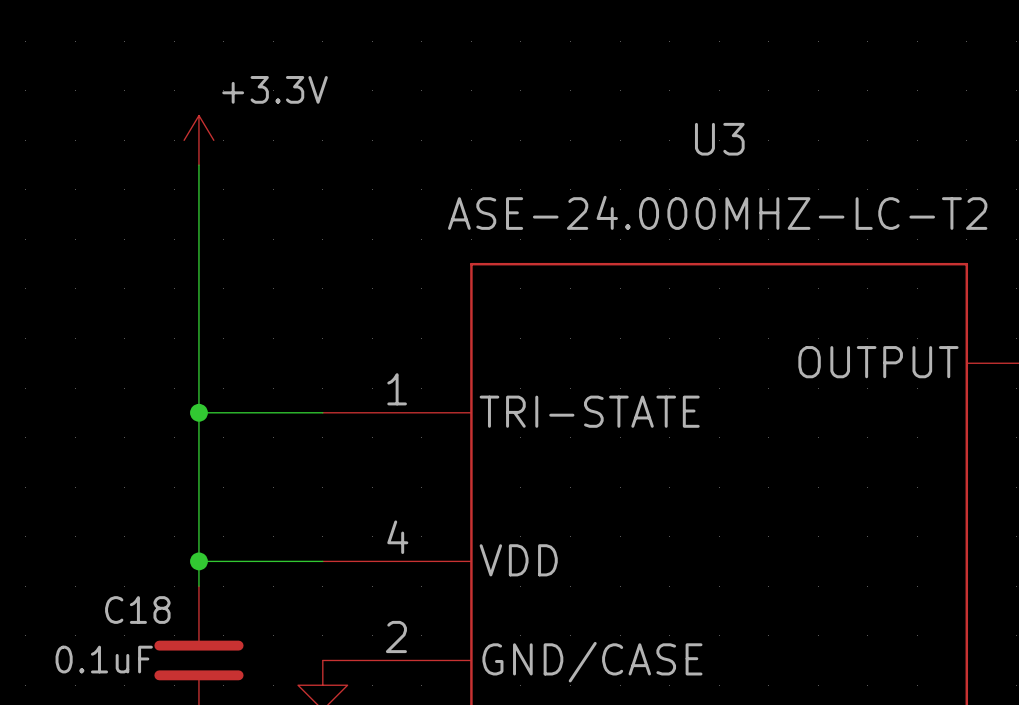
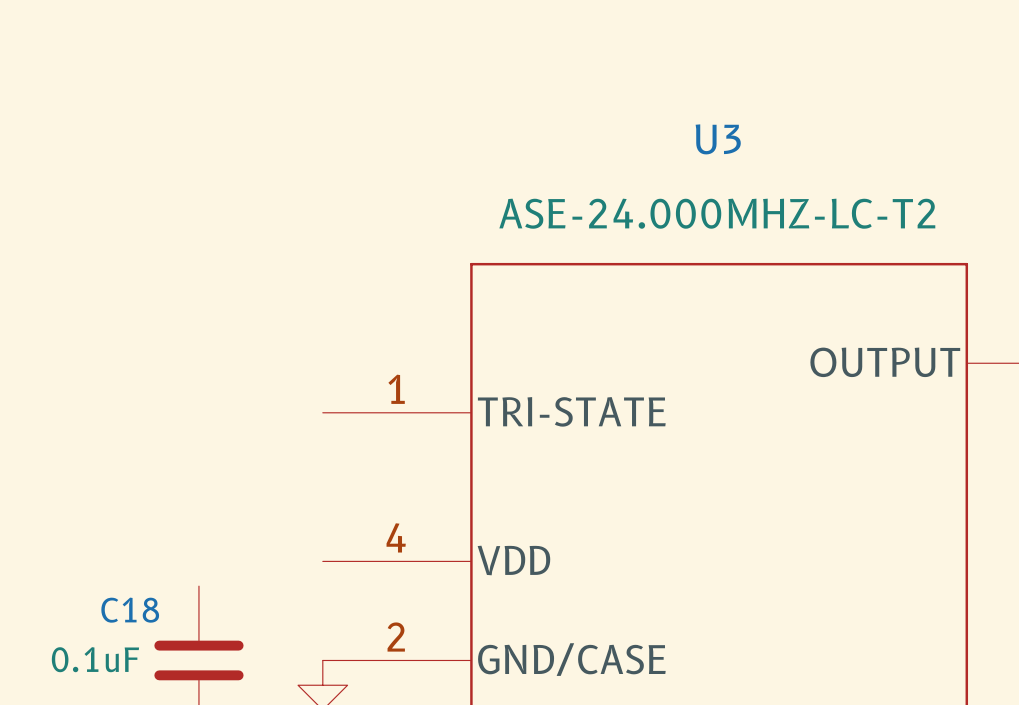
power symbol: +3.3V (198, 140) -> none
wire: (198, 165) (198, 586) -> none
wire: (198, 412) (322, 412) -> none
junction: (198, 412) -> none
wire: (198, 561) (322, 561) -> none
junction: (198, 561) -> none

